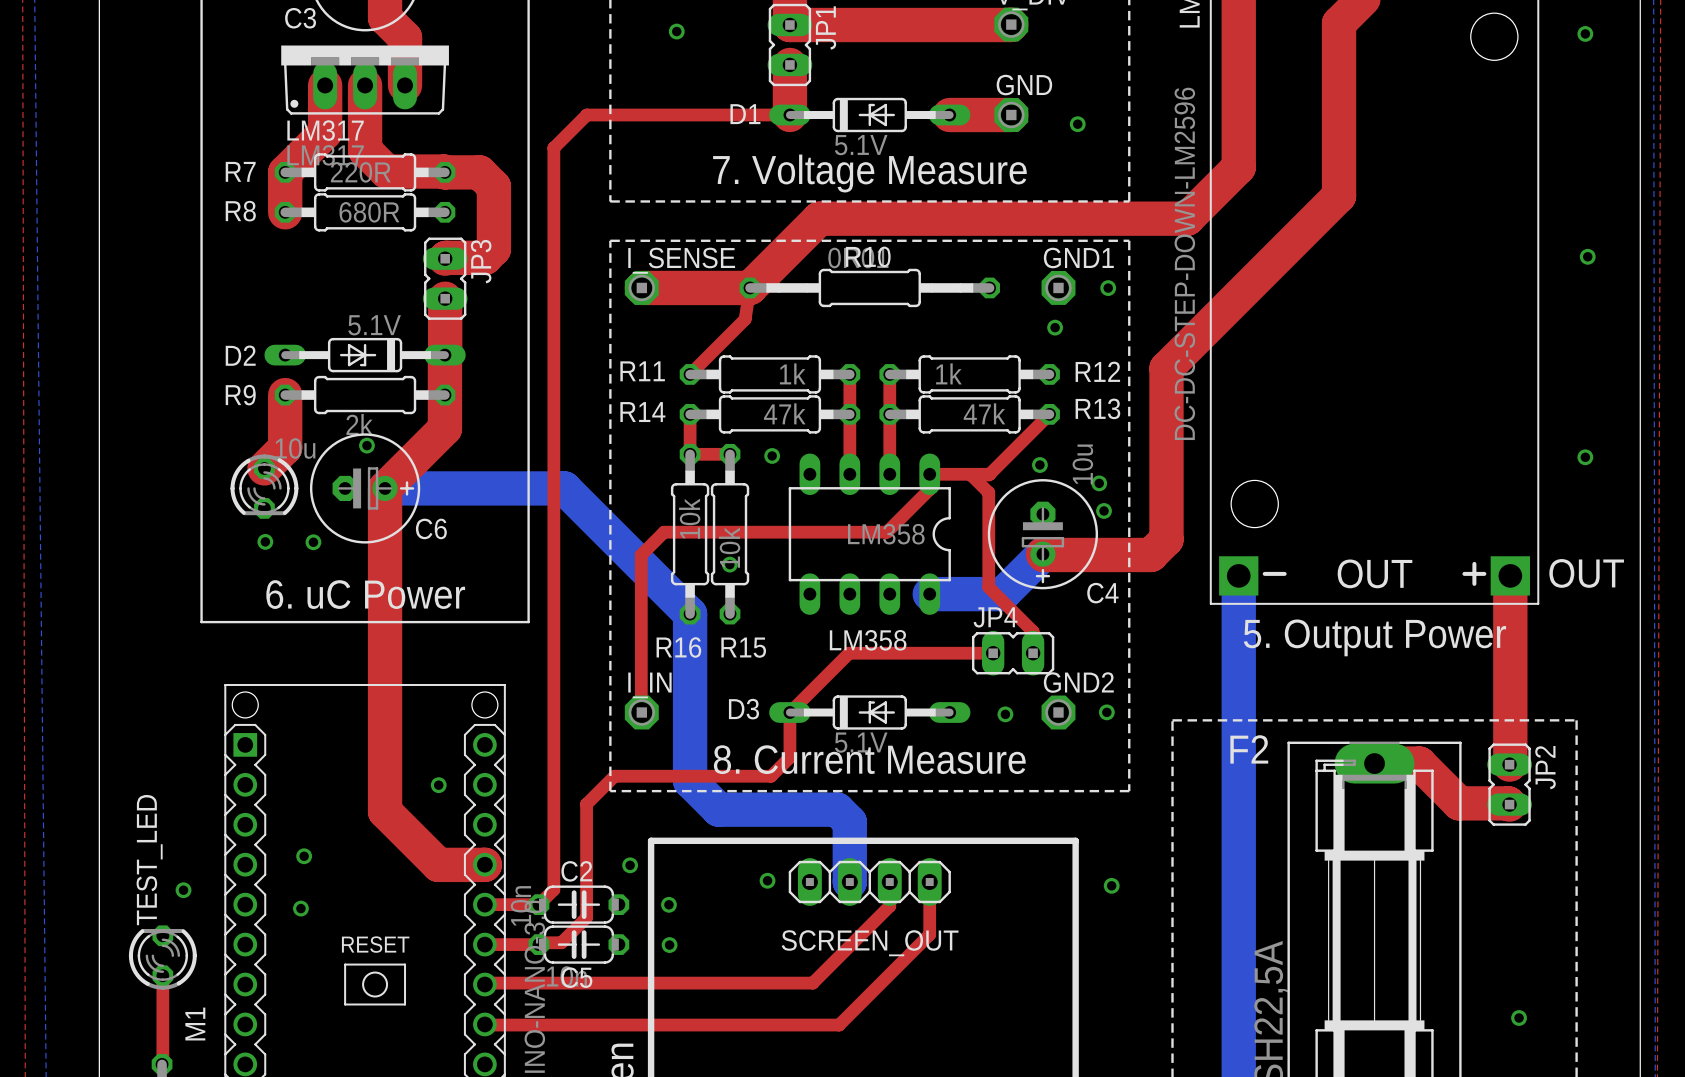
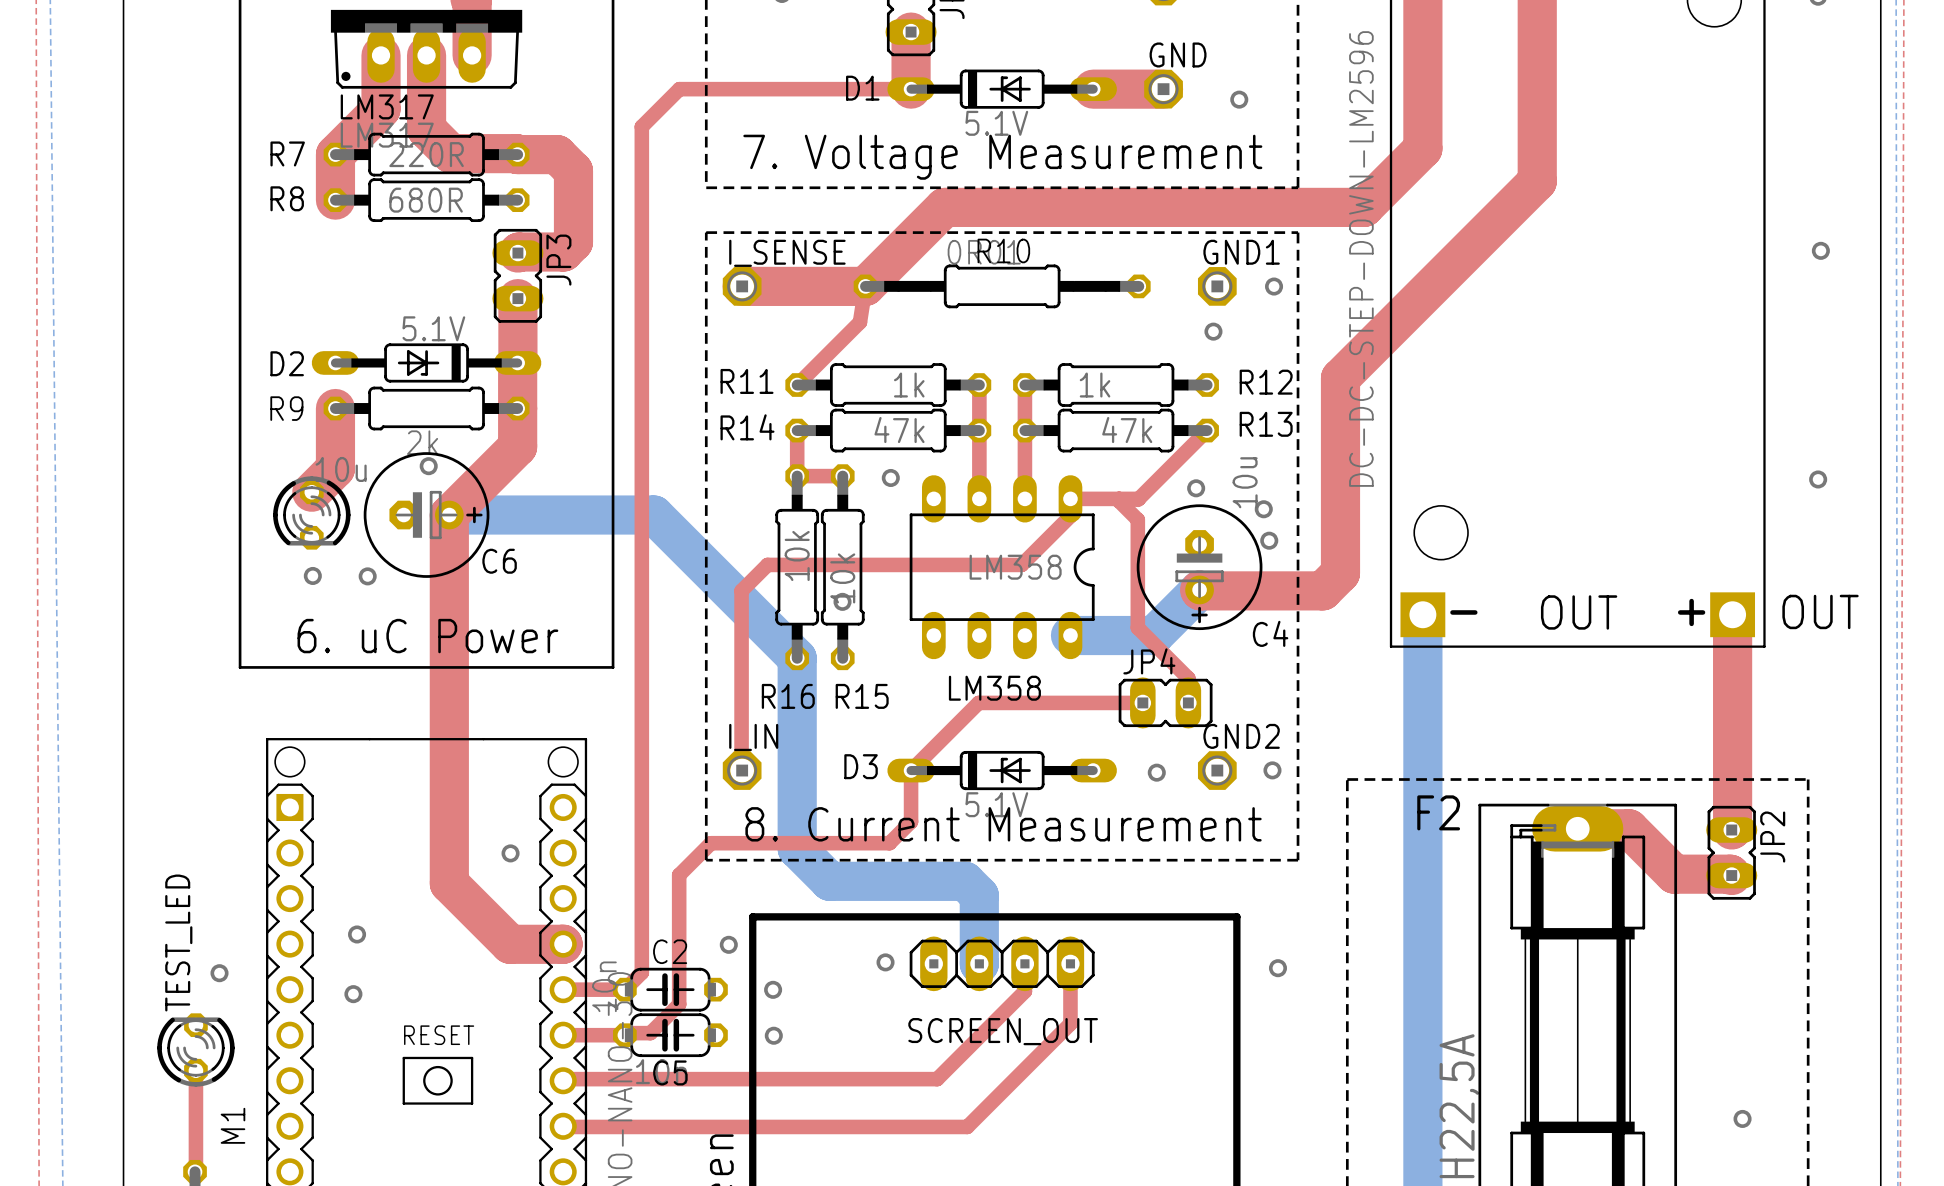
text: 7. Voltage Measure (869, 173) -> 7. Voltage Measurement (1002, 157)
text: 5. Output Power (1374, 637) -> none
text: 8. Current Measure (869, 759) -> 8. Current Measurement (1003, 824)

